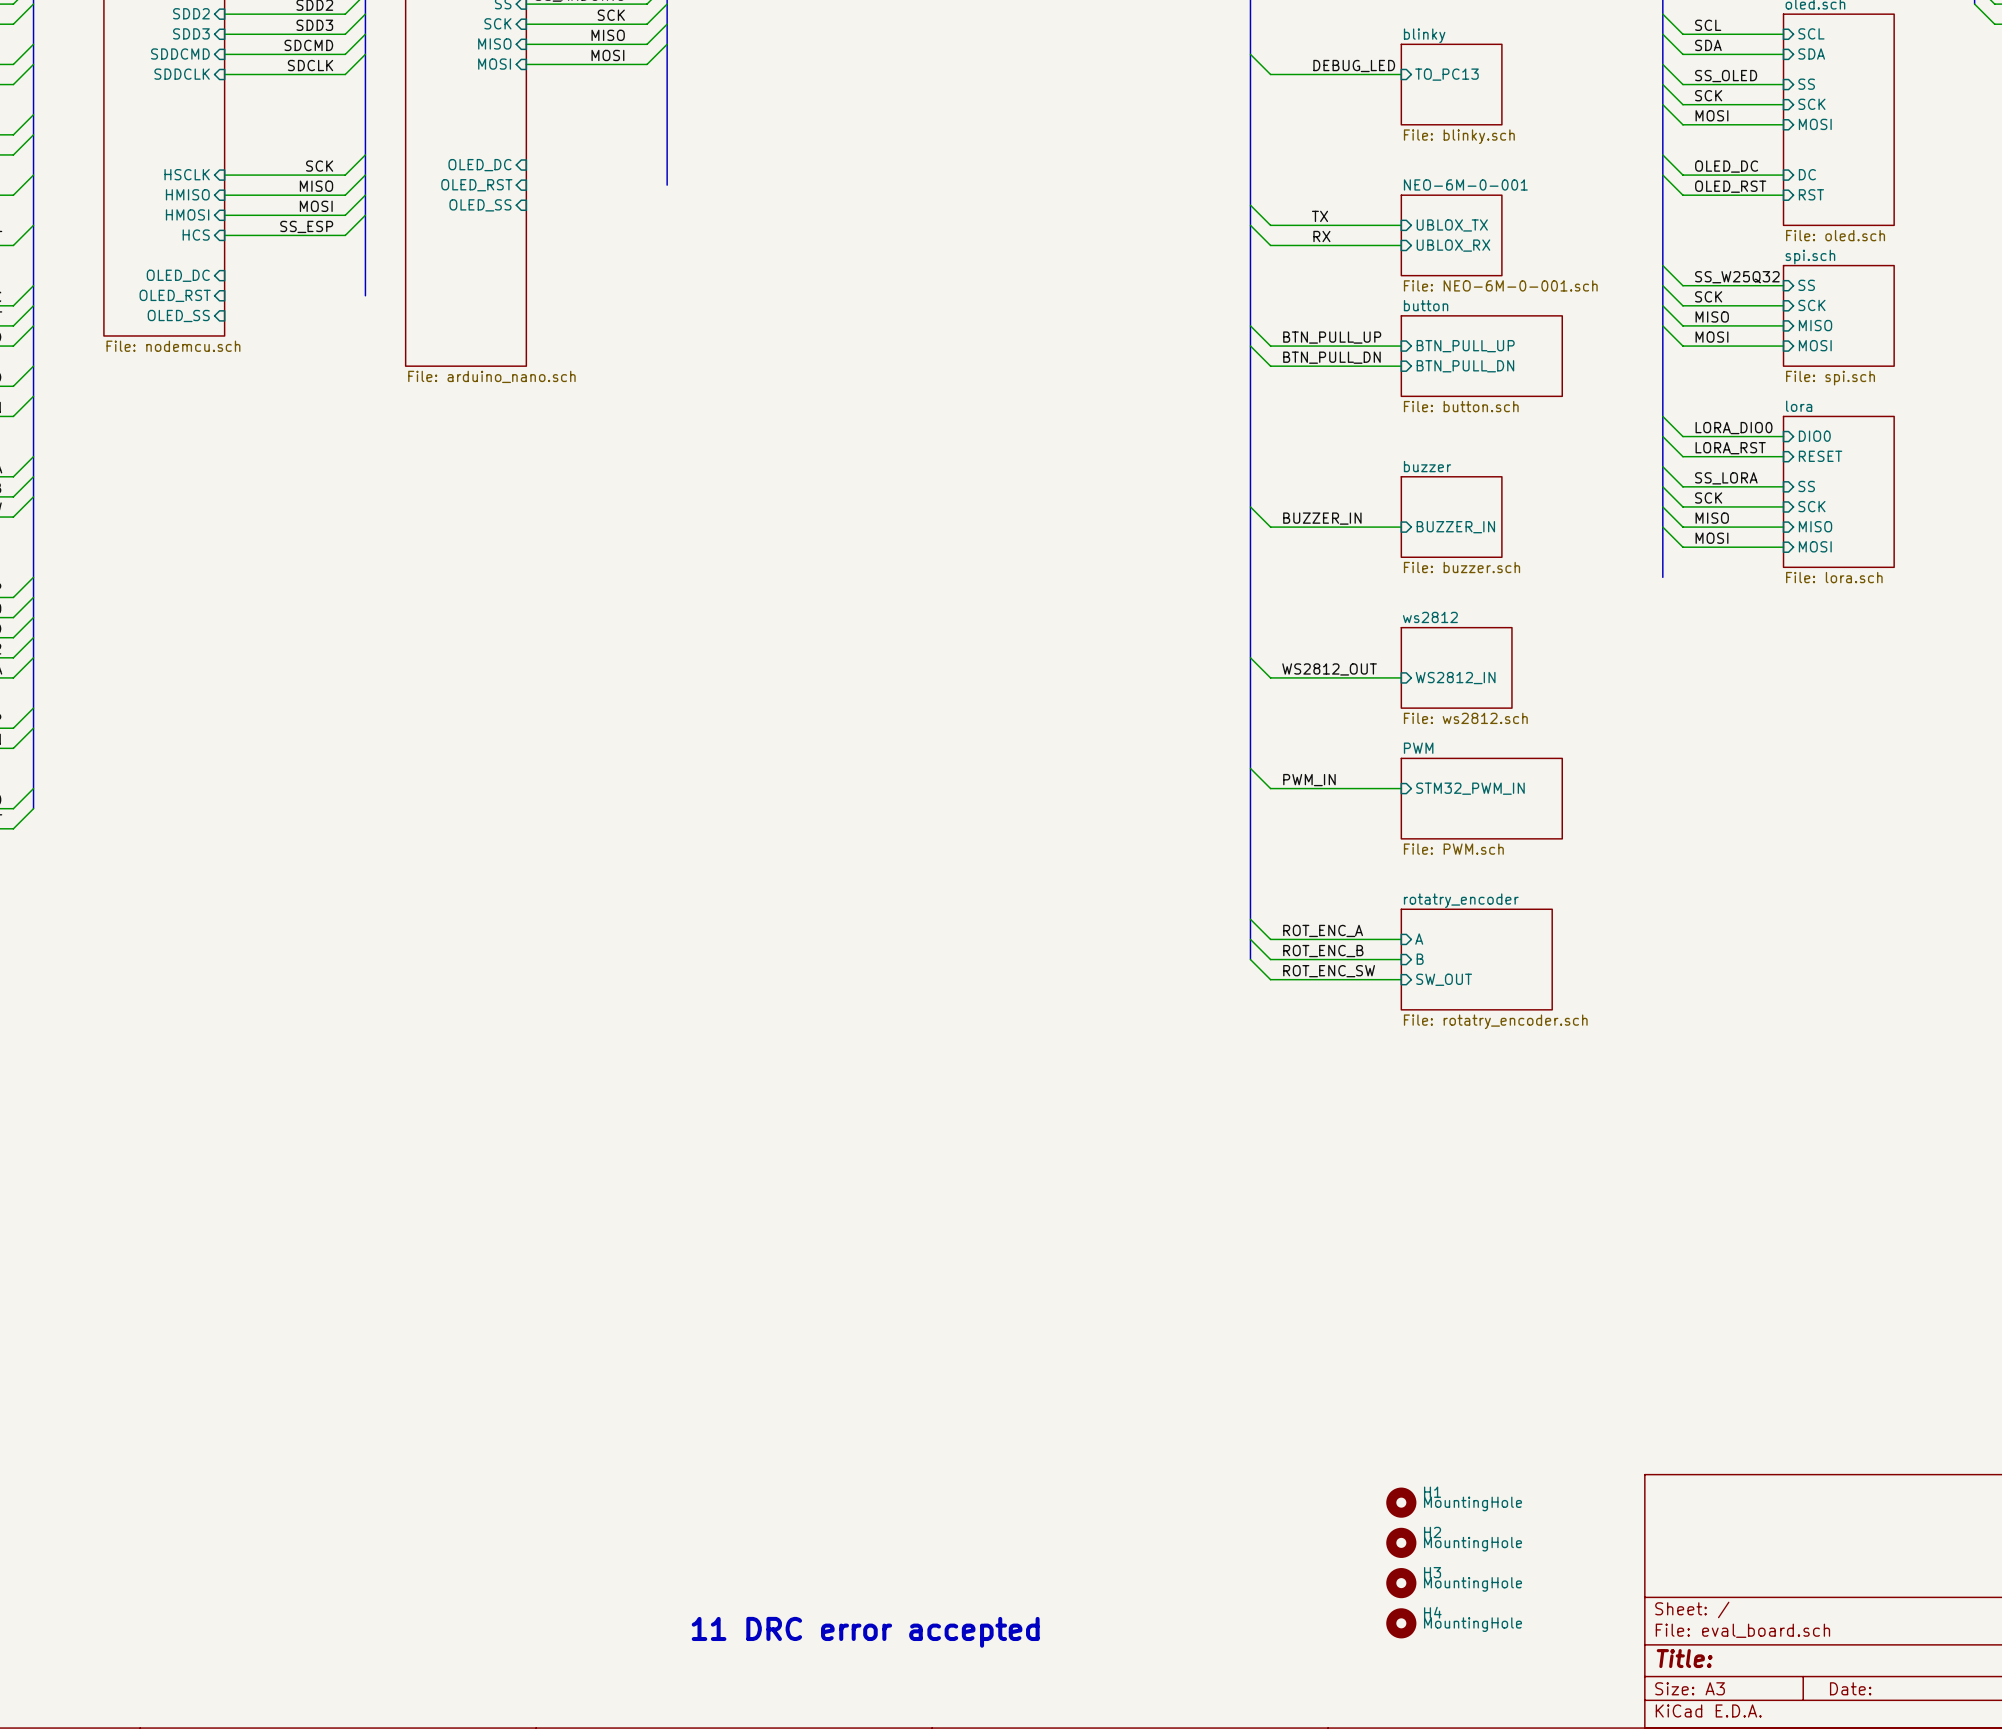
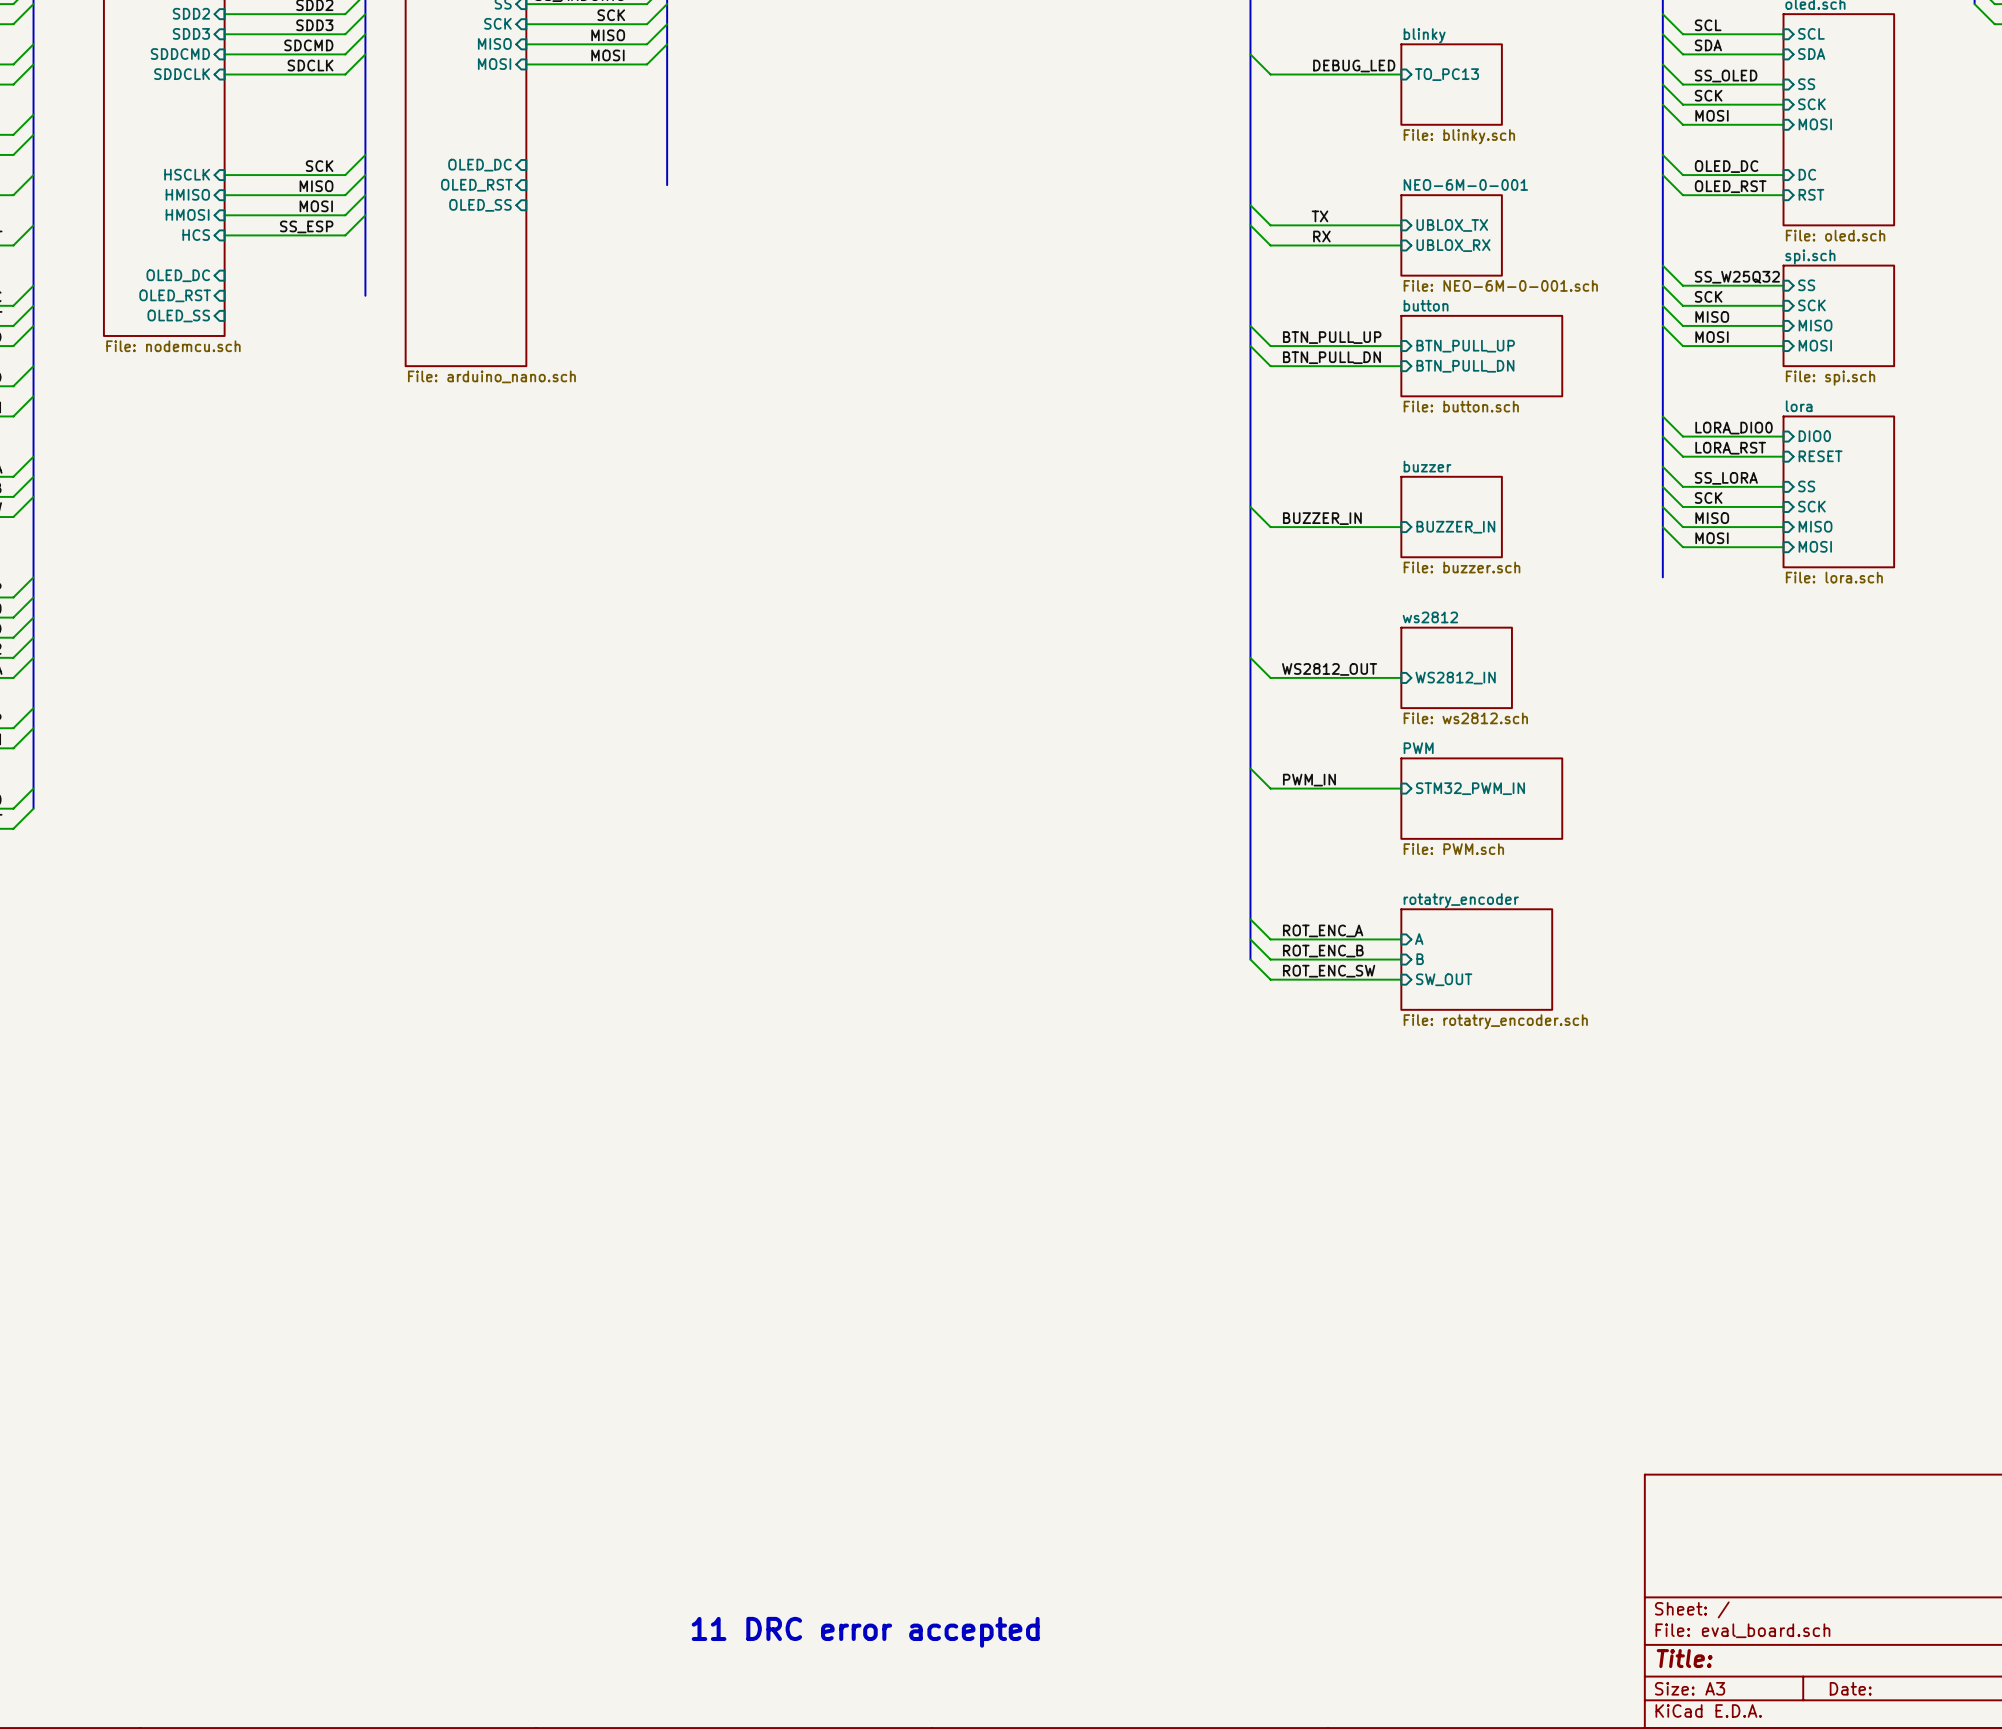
H1: MountingHole (1401, 1502) -> none
H2: MountingHole (1401, 1542) -> none
H3: MountingHole (1401, 1583) -> none
H4: MountingHole (1401, 1623) -> none

